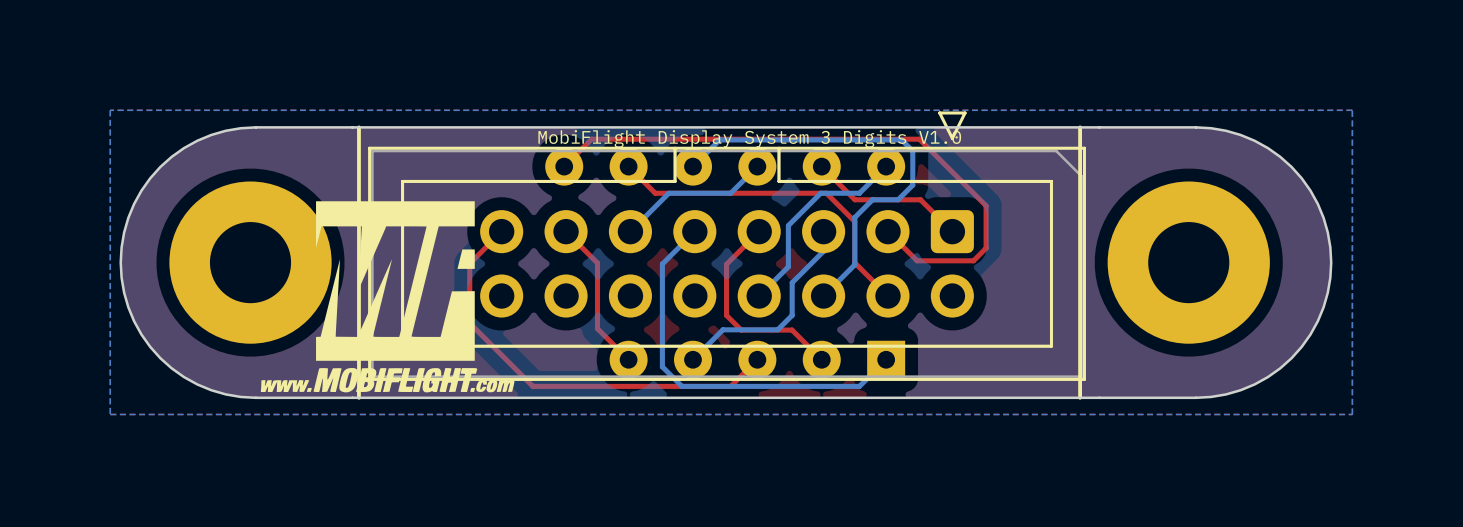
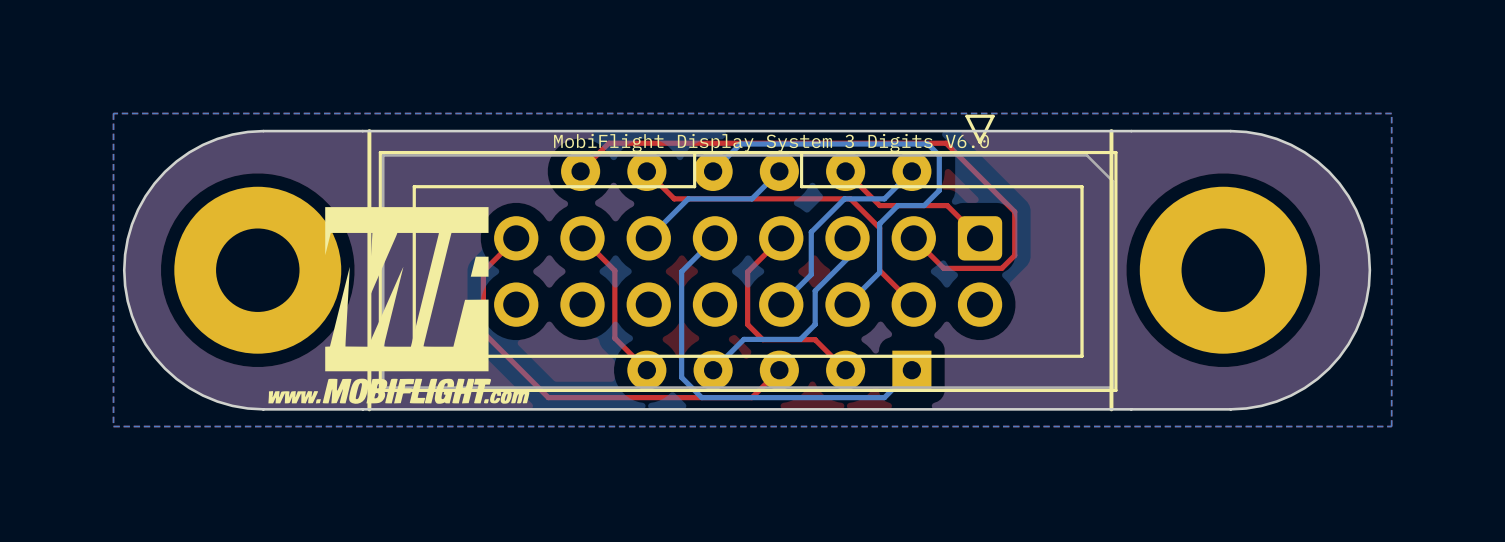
text: MobiFlight Display System 3 Digits V1.0 (749, 138) -> MobiFlight Display System 3 Digits V6.0 (771, 142)

